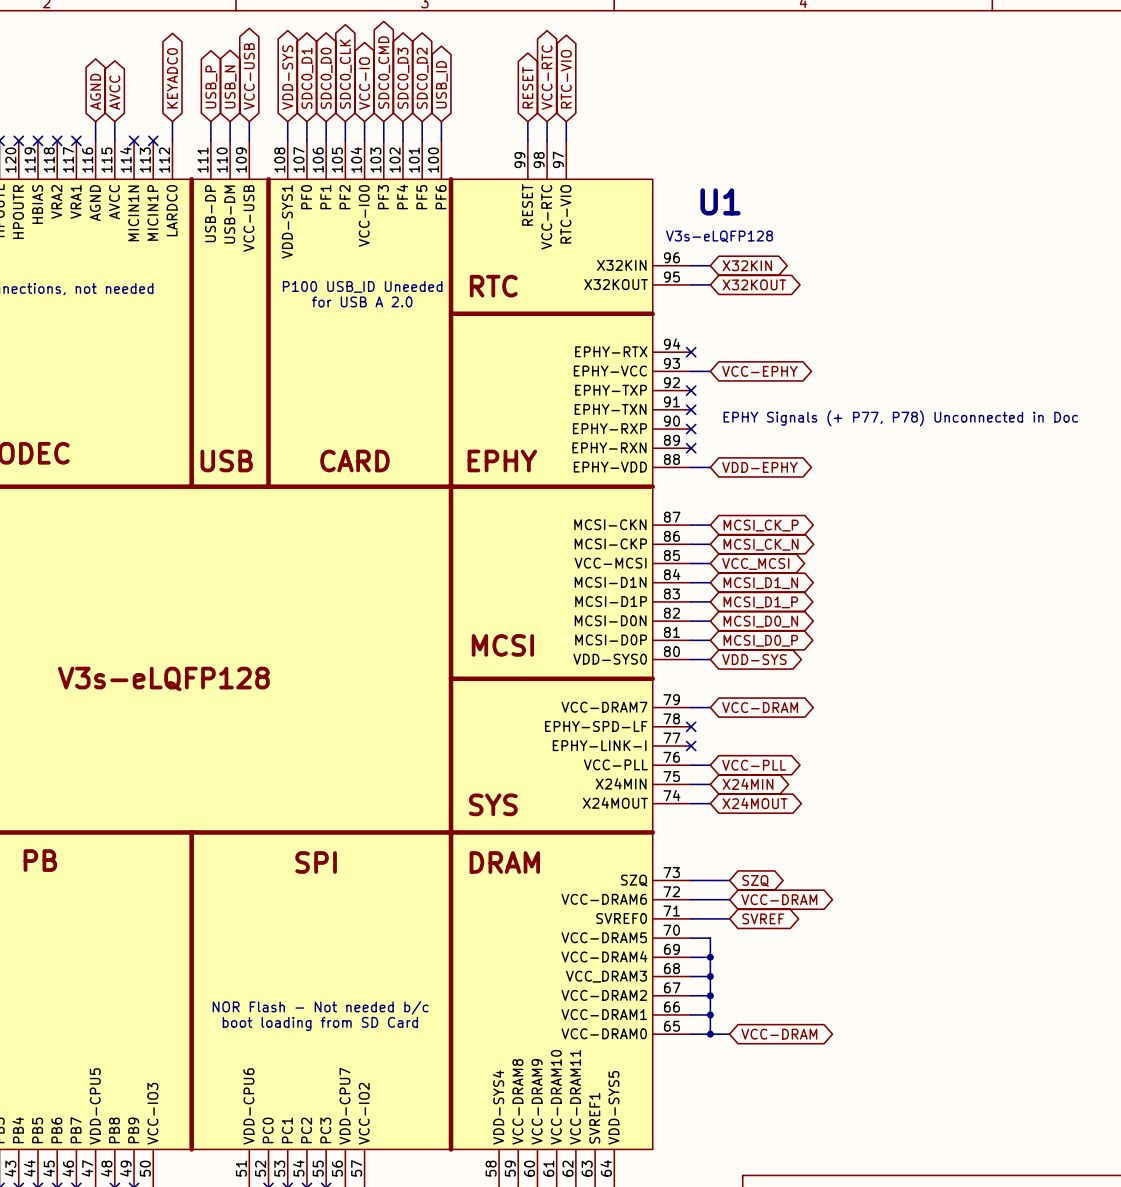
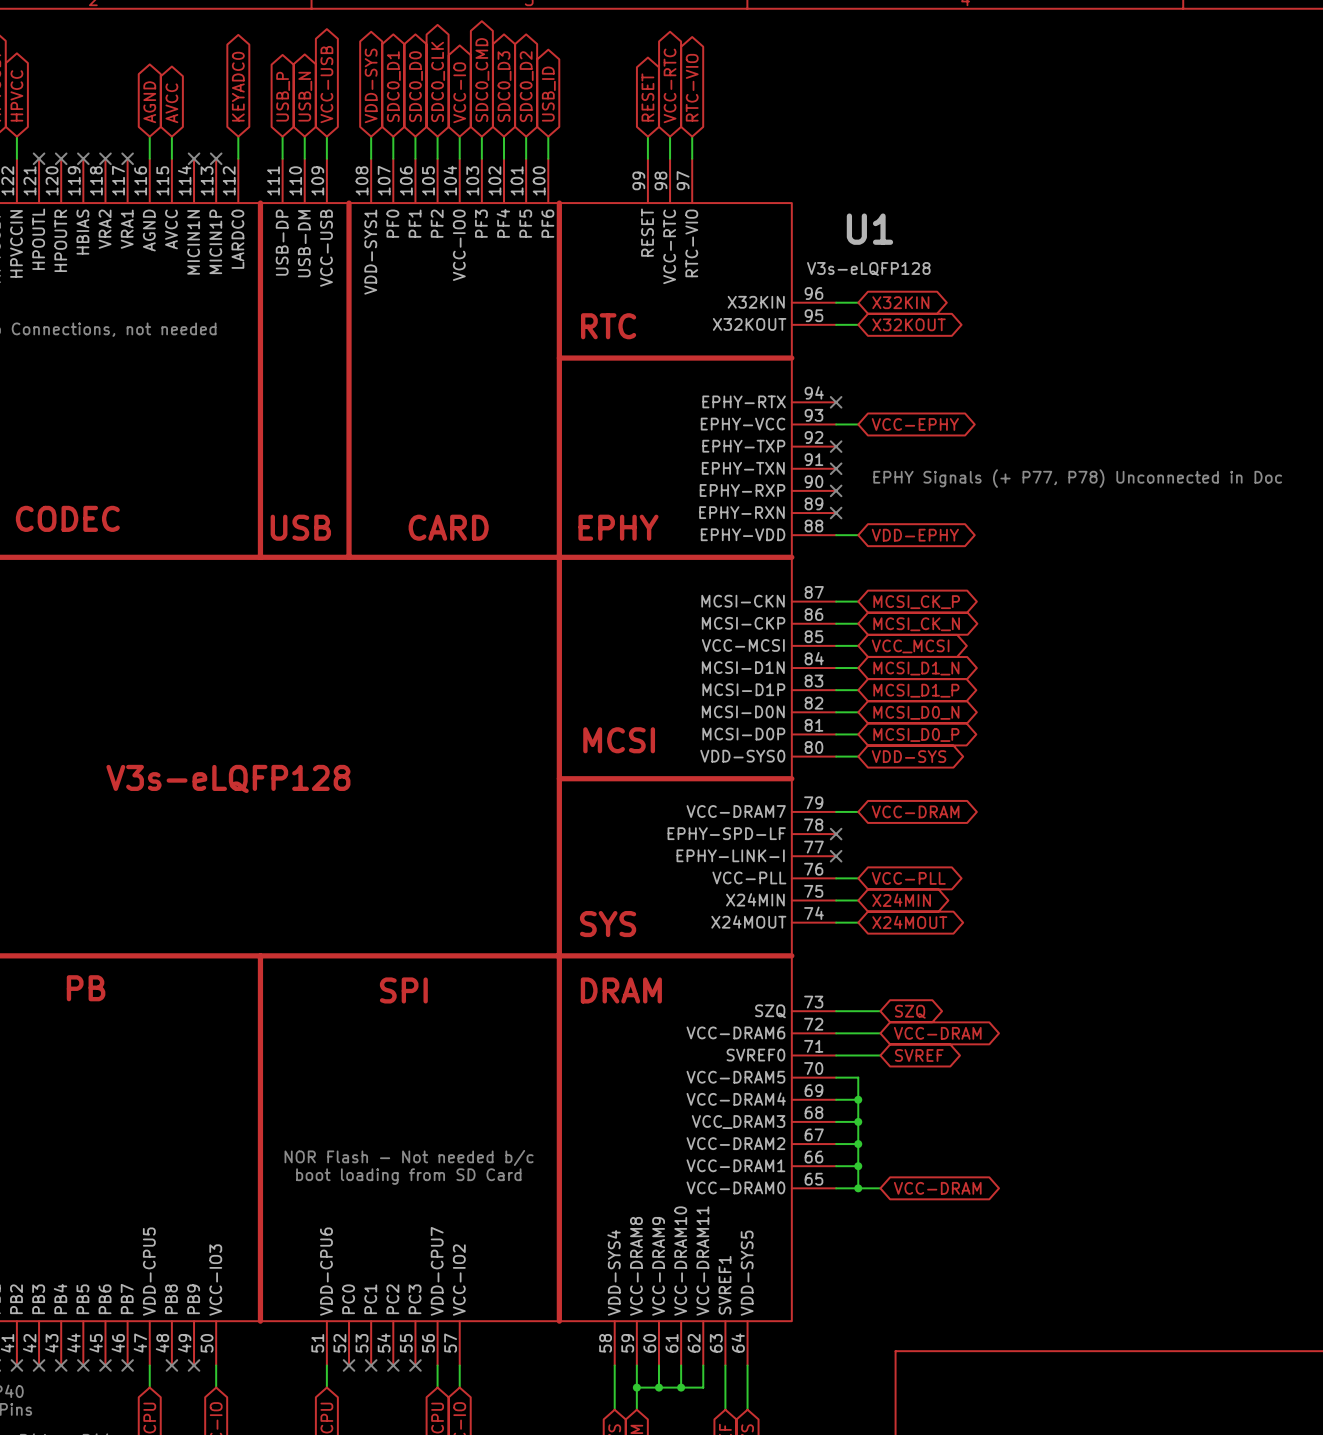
text: P100 USB_ID Uneeded (362, 286) -> none
text: for USB A 2.0 (362, 301) -> none

